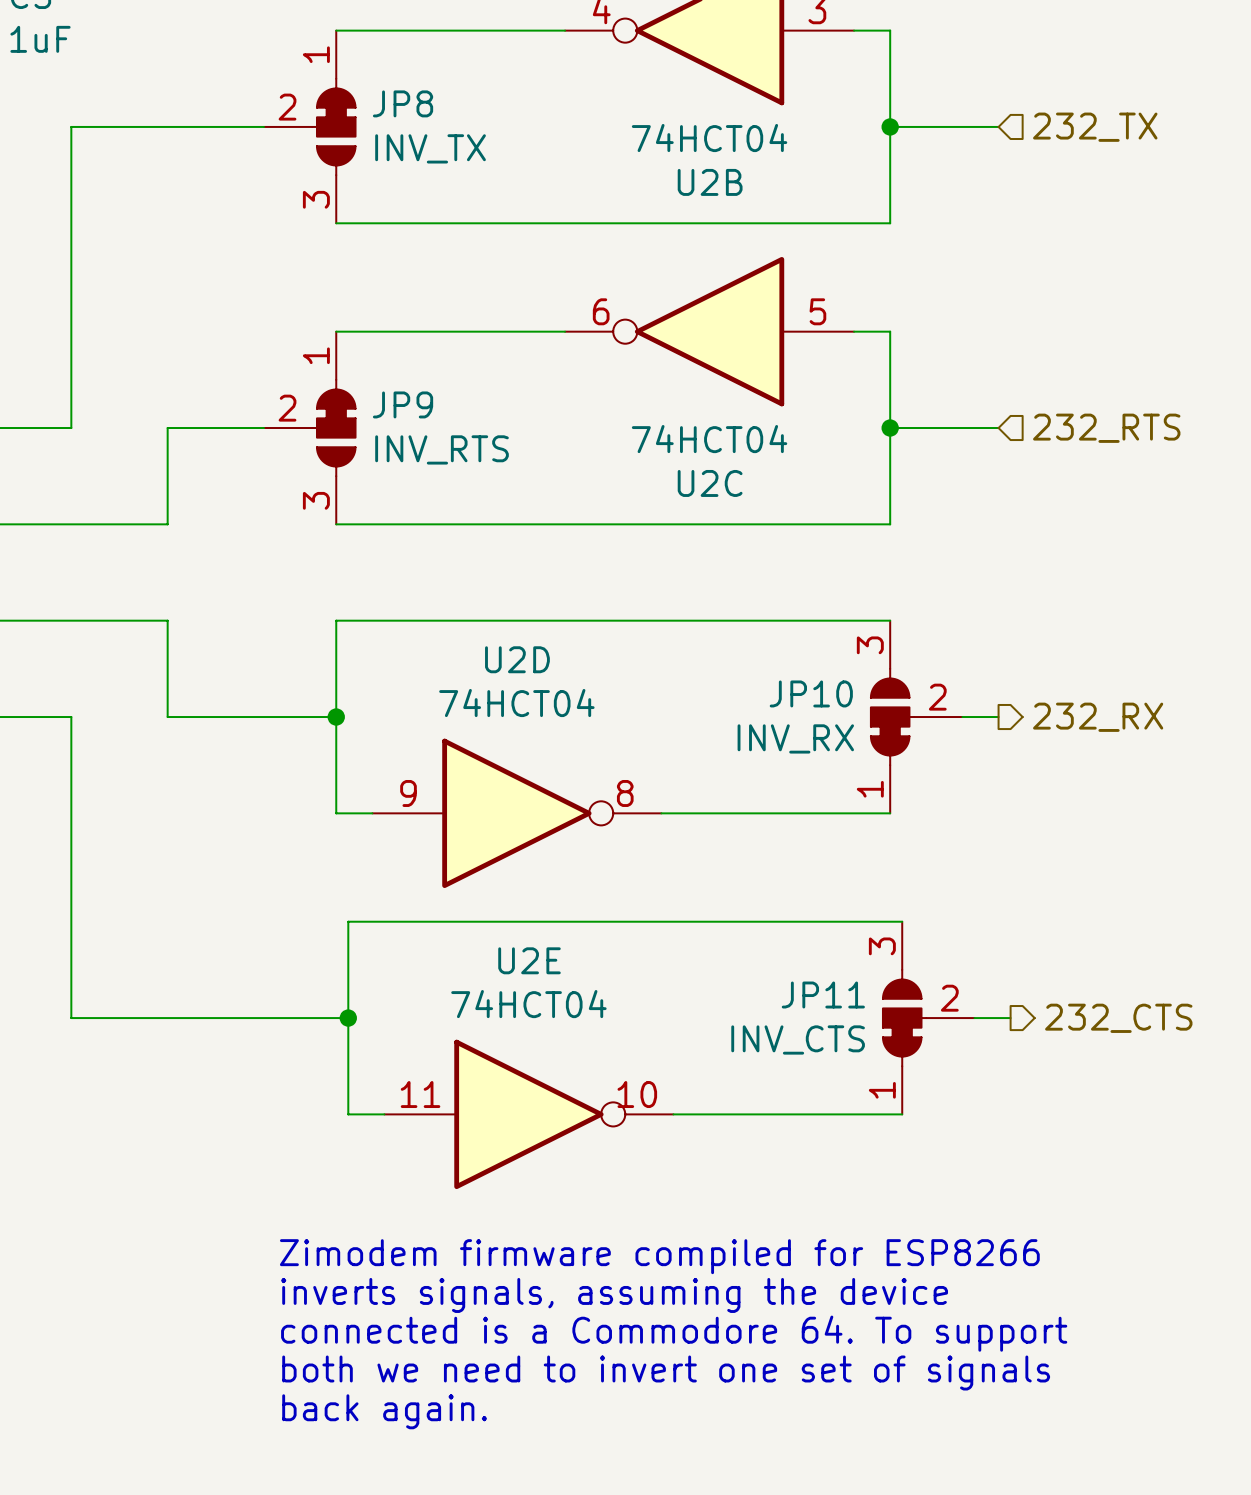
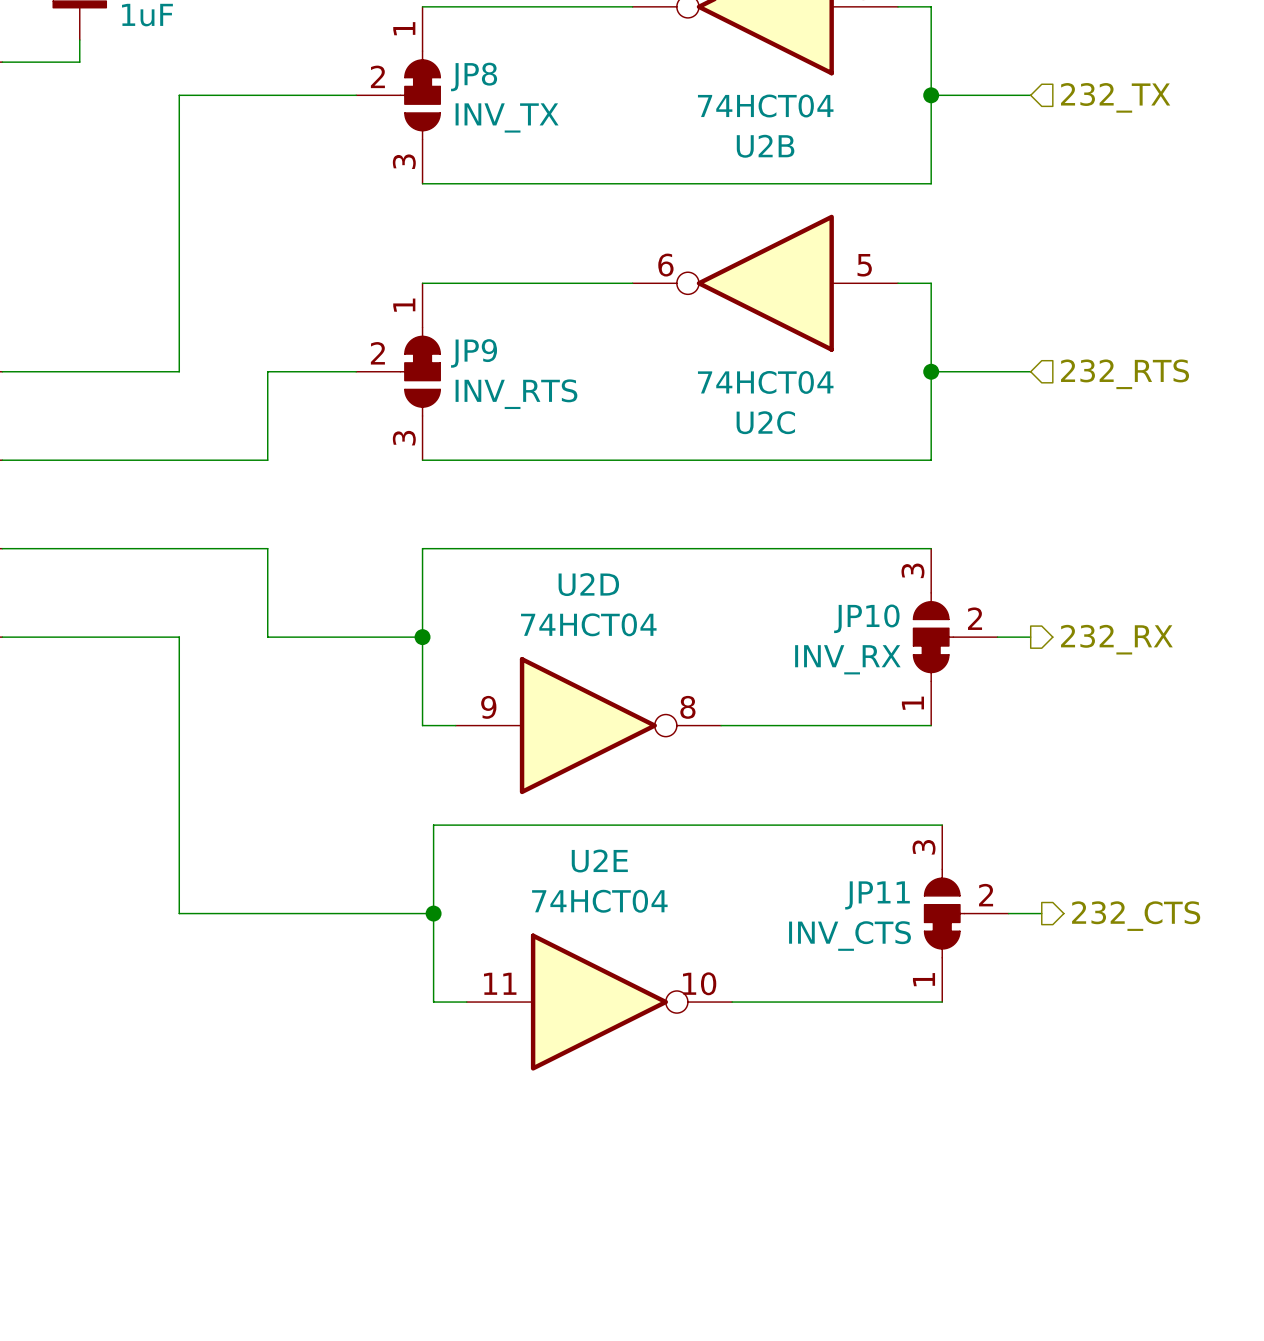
text: Zimodem firmware compiled for ESP8266 (659, 1256) -> none
text: inverts signals, assuming the device (614, 1295) -> none
text: connected is a Commodore 64. To support (674, 1333) -> none
text: both we need to invert one set of signals (666, 1372) -> none
text: back again. (384, 1411) -> none

